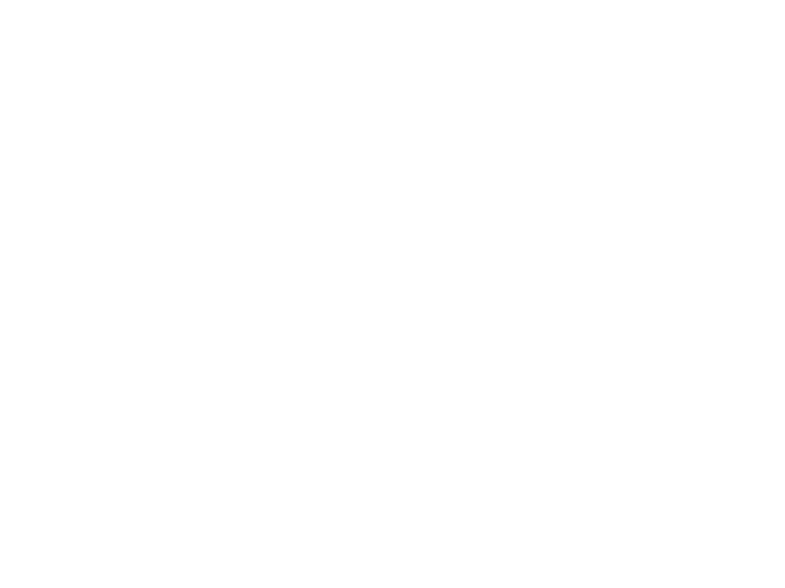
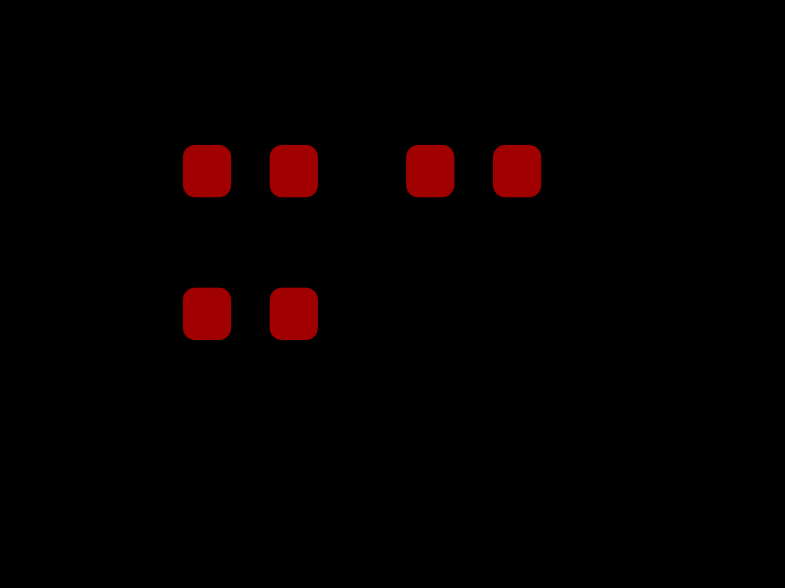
part: none -> (250, 171)
part: none -> (473, 171)
part: none -> (250, 313)

